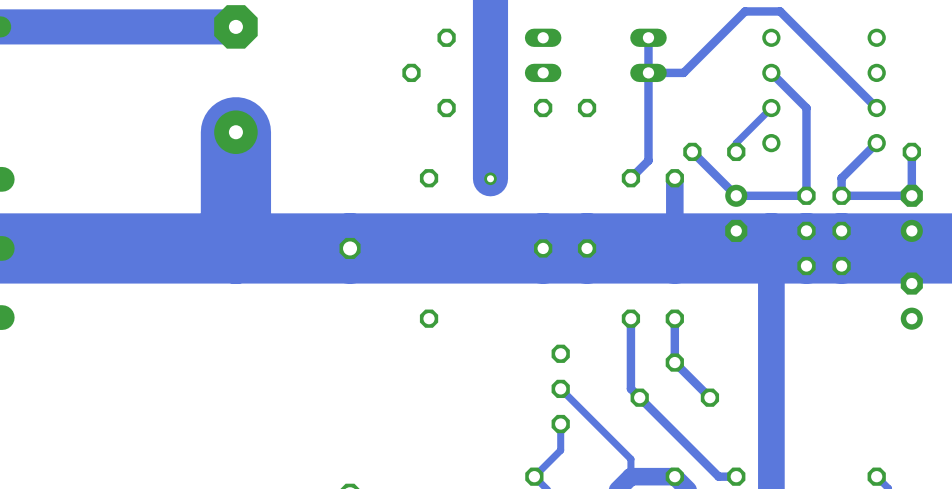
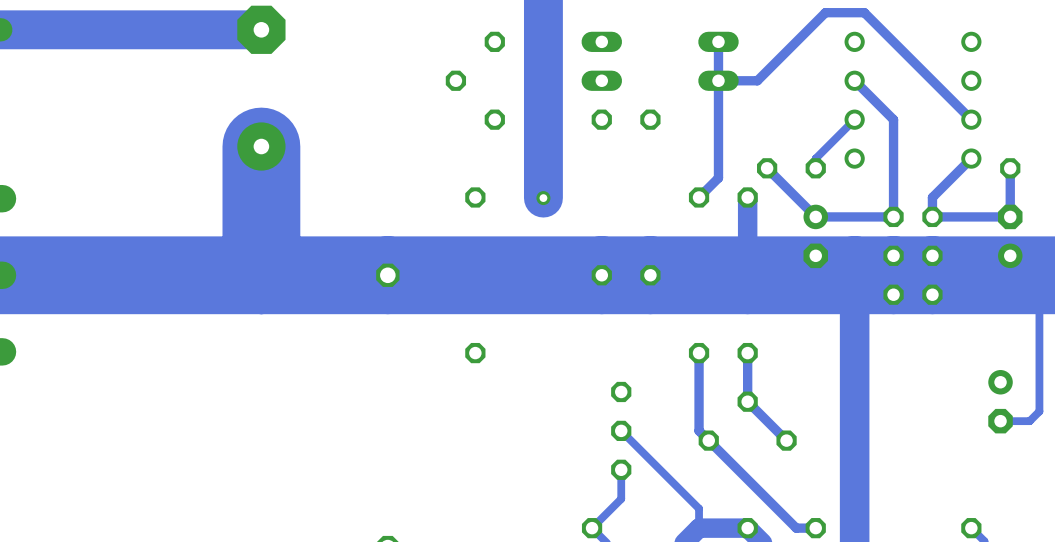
track: none -> (1039, 265) (1039, 411) (1029, 421) (1000, 421)
part rotation: 0° (911, 301) -> 180° (1000, 401)
part position: (911, 301) -> (1000, 401)

